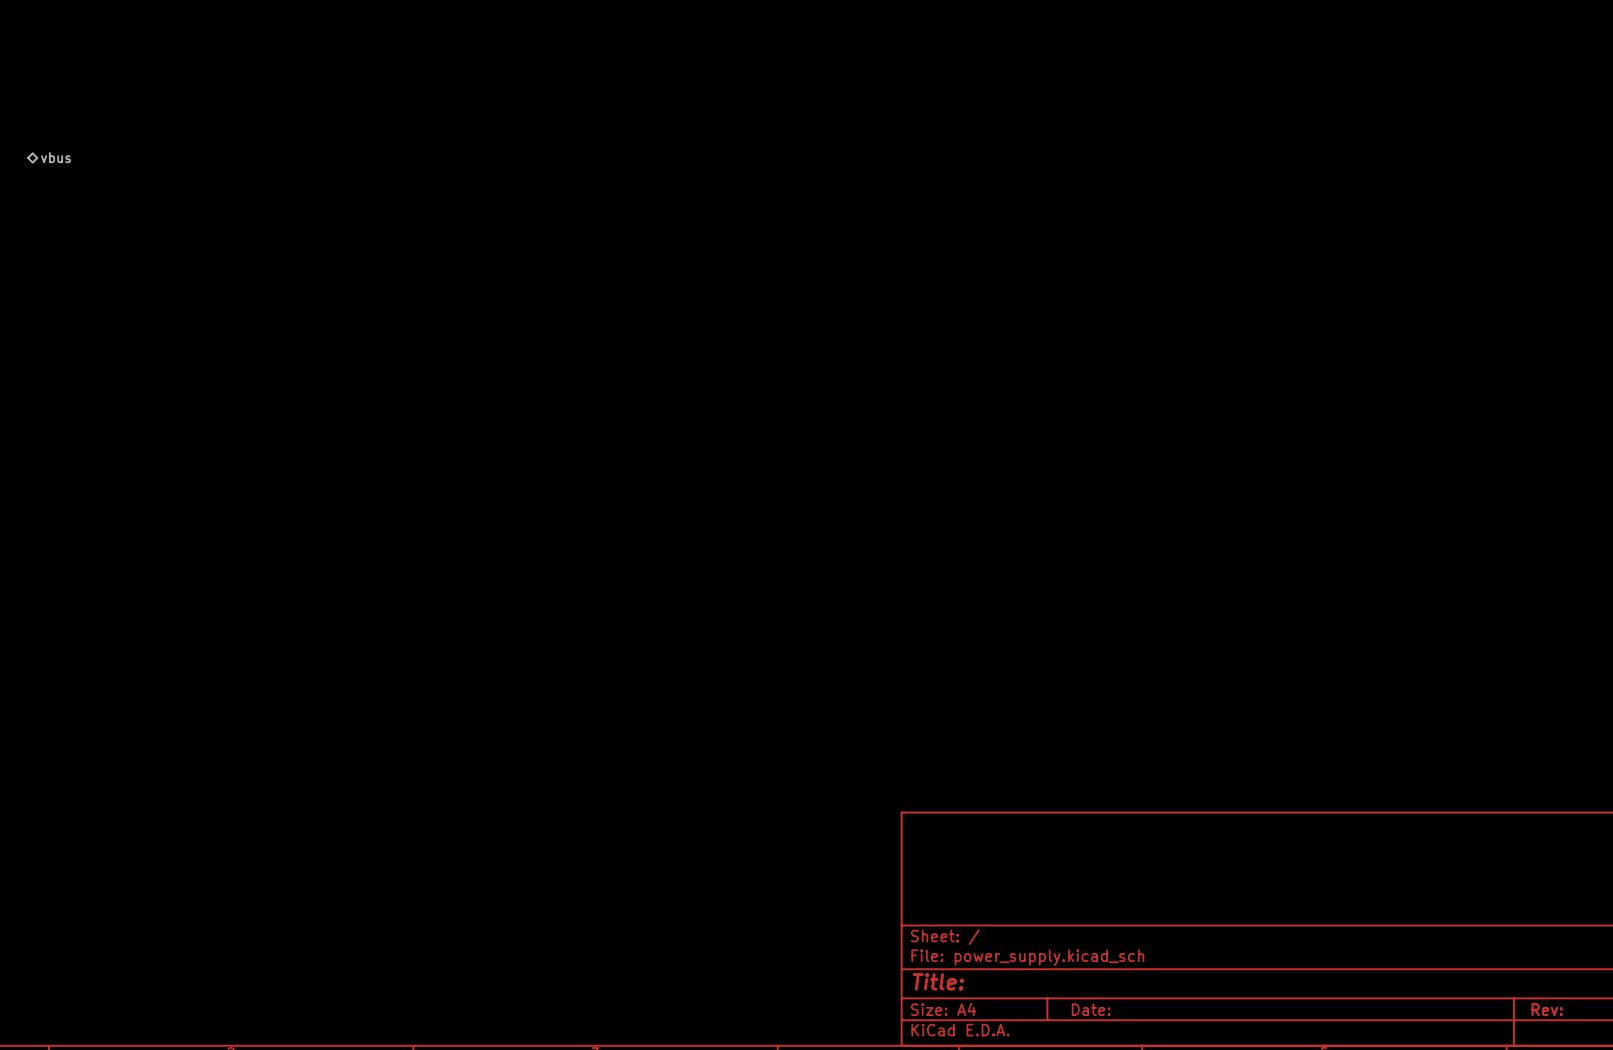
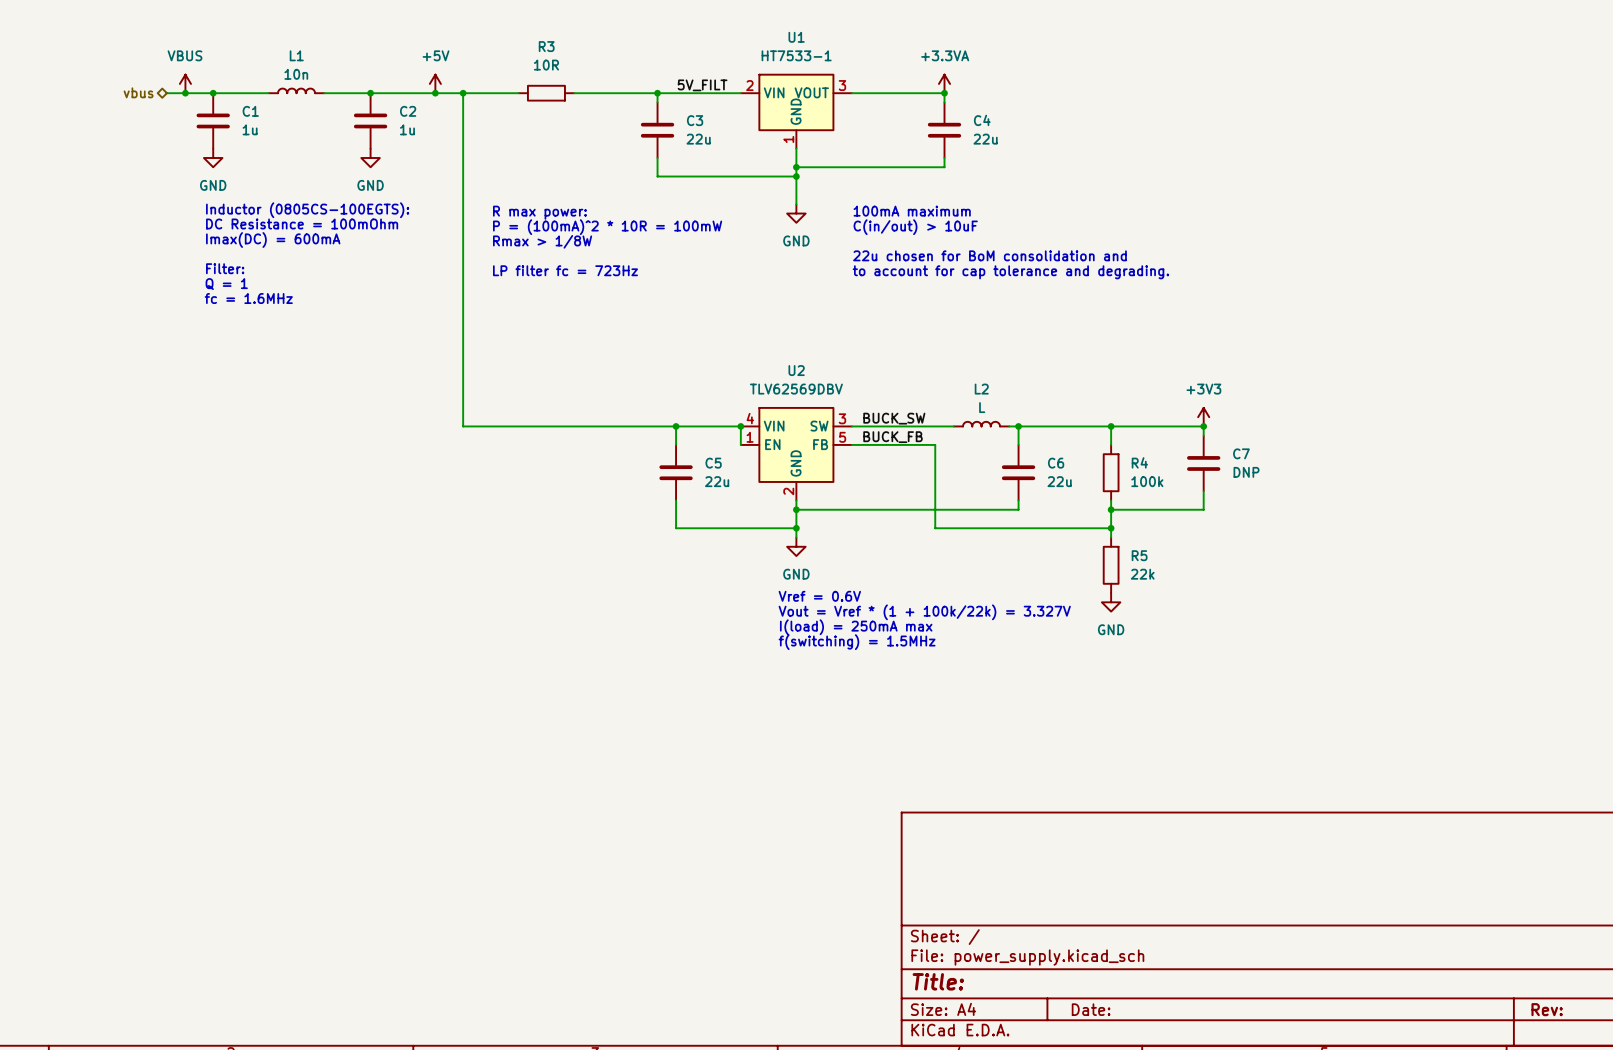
power symbol: none -> VBUS (185, 83)
power symbol: none -> +5V (435, 83)
power symbol: none -> +3.3VA (944, 83)
label: none -> 5V_FILT (702, 85)
L1: none -> 10n (296, 90)
wire: none -> (166, 93) (268, 93)
junction: none -> (185, 93)
junction: none -> (213, 93)
wire: none -> (324, 93) (518, 93)
junction: none -> (370, 93)
junction: none -> (435, 93)
wire: none -> (463, 93) (463, 426) (740, 426) (740, 444)
junction: none -> (463, 93)
R3: none -> 10R (546, 93)
wire: none -> (574, 93) (740, 93)
wire: none -> (657, 93) (657, 102)
junction: none -> (657, 93)
wire: none -> (851, 93) (944, 93) (944, 102)
junction: none -> (944, 93)
U1: none -> HT7533-1 (796, 111)
C1: none -> 1u (213, 120)
C2: none -> 1u (370, 120)
C3: none -> 22u (657, 130)
C4: none -> 22u (944, 130)
wire: none -> (796, 148) (796, 204)
hierarchical label rotation: 0° (55, 157) -> 180° (138, 92)
hierarchical label position: vbus (55, 157) -> vbus (138, 92)
power symbol: none -> GND (213, 157)
power symbol: none -> GND (370, 157)
wire: none -> (657, 157) (657, 176) (796, 176)
wire: none -> (944, 157) (944, 167) (796, 167)
junction: none -> (796, 167)
junction: none -> (796, 176)
text: none -> Inductor (0805CS-100EGTS): (307, 210)
text: none -> 100mA maximum (912, 211)
text: none -> R max power: (539, 212)
power symbol: none -> GND (796, 213)
text: none -> DC Resistance = 100mOhm (302, 224)
text: none -> P = (100mA)^2 * 10R = 100mW (607, 227)
text: none -> C(in/out) > 10uF (915, 227)
text: none -> Imax(DC) = 600mA (273, 240)
text: none -> Rmax > 1/8W (542, 241)
text: none -> 22u chosen for BoM consolidation and (989, 255)
text: none -> Filter: (225, 268)
text: none -> LP filter fc = 723Hz (565, 270)
text: none -> to account for cap tolerance and degrading. (1010, 272)
text: none -> Q = 1 (226, 284)
text: none -> fc = 1.6MHz (248, 298)
power symbol: none -> +3V3 (1203, 417)
label: none -> BUCK_SW (894, 418)
L2: none -> L (981, 424)
wire: none -> (676, 426) (676, 444)
junction: none -> (676, 426)
junction: none -> (740, 426)
wire: none -> (851, 426) (953, 426)
wire: none -> (1009, 426) (1203, 426) (1203, 435)
wire: none -> (1018, 426) (1018, 444)
junction: none -> (1018, 426)
wire: none -> (1111, 426) (1111, 444)
junction: none -> (1111, 426)
junction: none -> (1203, 426)
label: none -> BUCK_FB (892, 437)
wire: none -> (851, 444) (935, 444) (935, 528) (1111, 528)
U2: none -> TLV62569DBV (796, 453)
C7: none -> DNP (1203, 463)
C5: none -> 22u (676, 472)
C6: none -> 22u (1018, 472)
R4: none -> 100k (1111, 472)
wire: none -> (1203, 491) (1203, 509) (1111, 509)
wire: none -> (676, 500) (676, 528) (796, 528)
wire: none -> (796, 500) (796, 537)
wire: none -> (1018, 500) (1018, 509) (796, 509)
wire: none -> (1111, 500) (1111, 537)
junction: none -> (796, 509)
junction: none -> (1111, 509)
junction: none -> (796, 528)
junction: none -> (1111, 528)
power symbol: none -> GND (796, 546)
R5: none -> 22k (1111, 565)
text: none -> Vref = 0.6V (819, 596)
power symbol: none -> GND (1111, 602)
text: none -> Vout = Vref * (1 + 100k/22k) = 3.327V (924, 612)
text: none -> I(load) = 250mA max (856, 627)
text: none -> f(switching) = 1.5MHz (857, 642)

